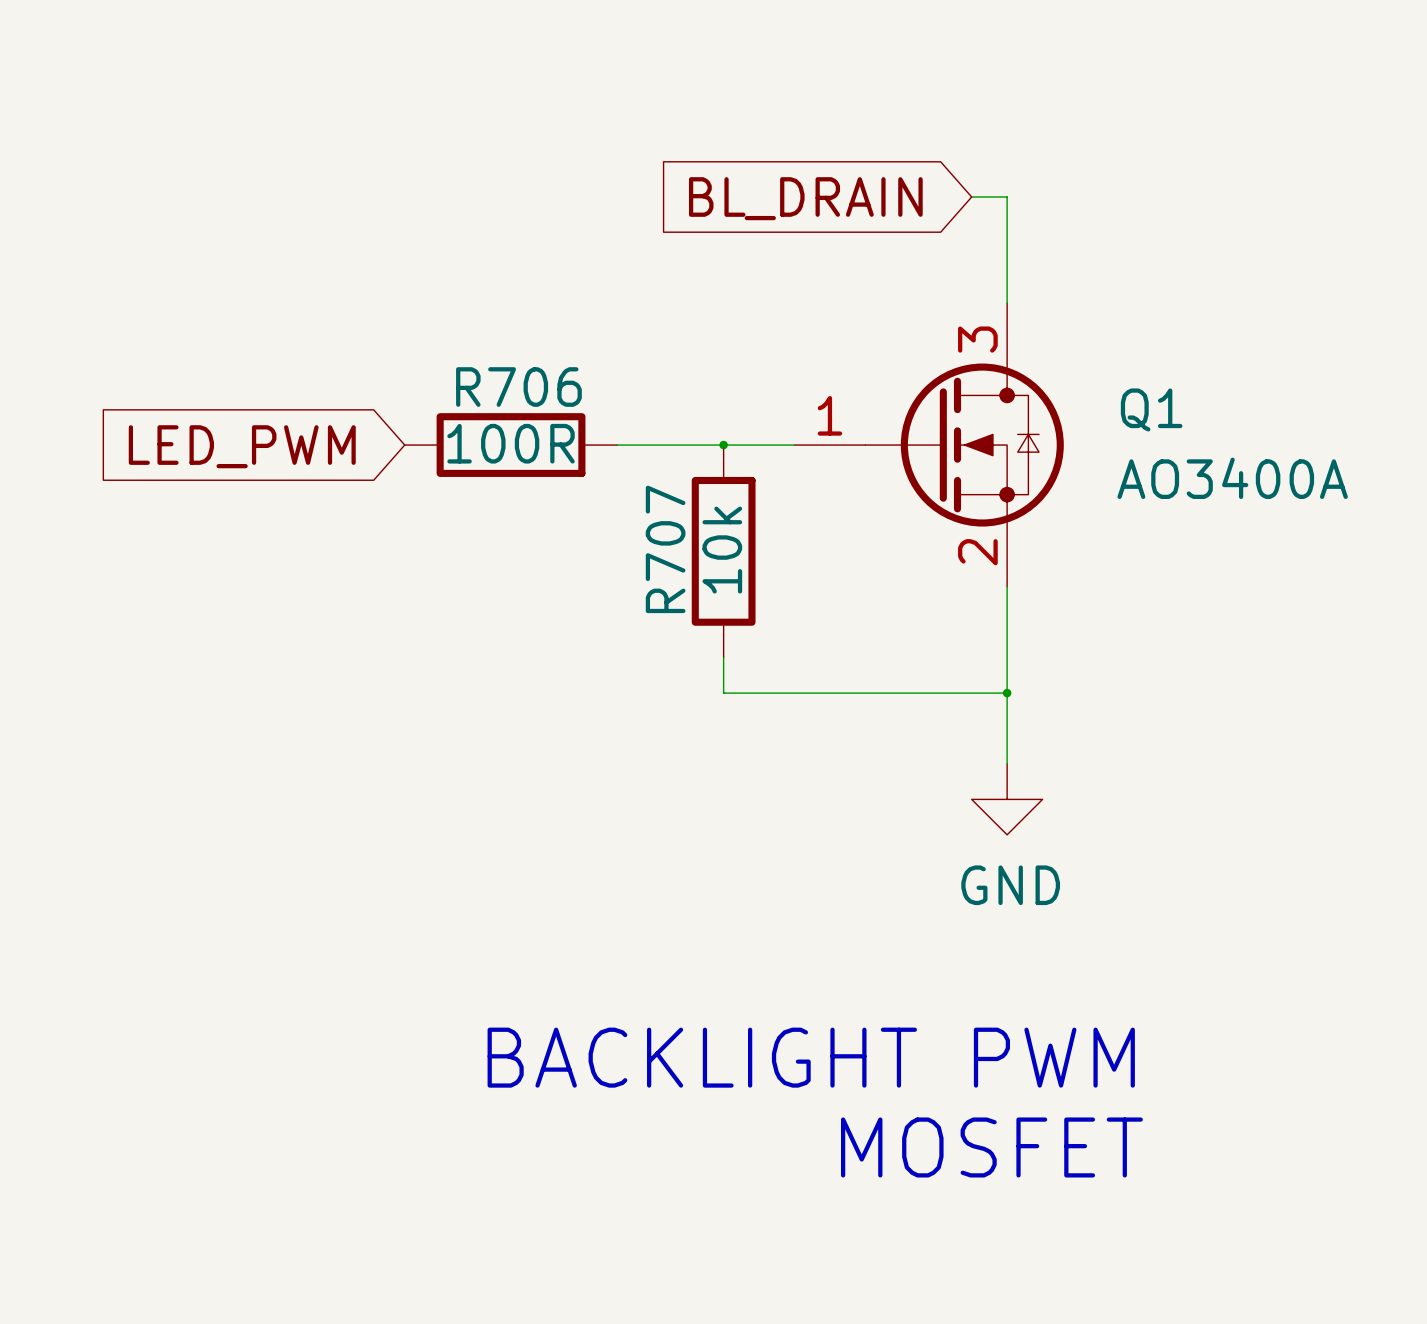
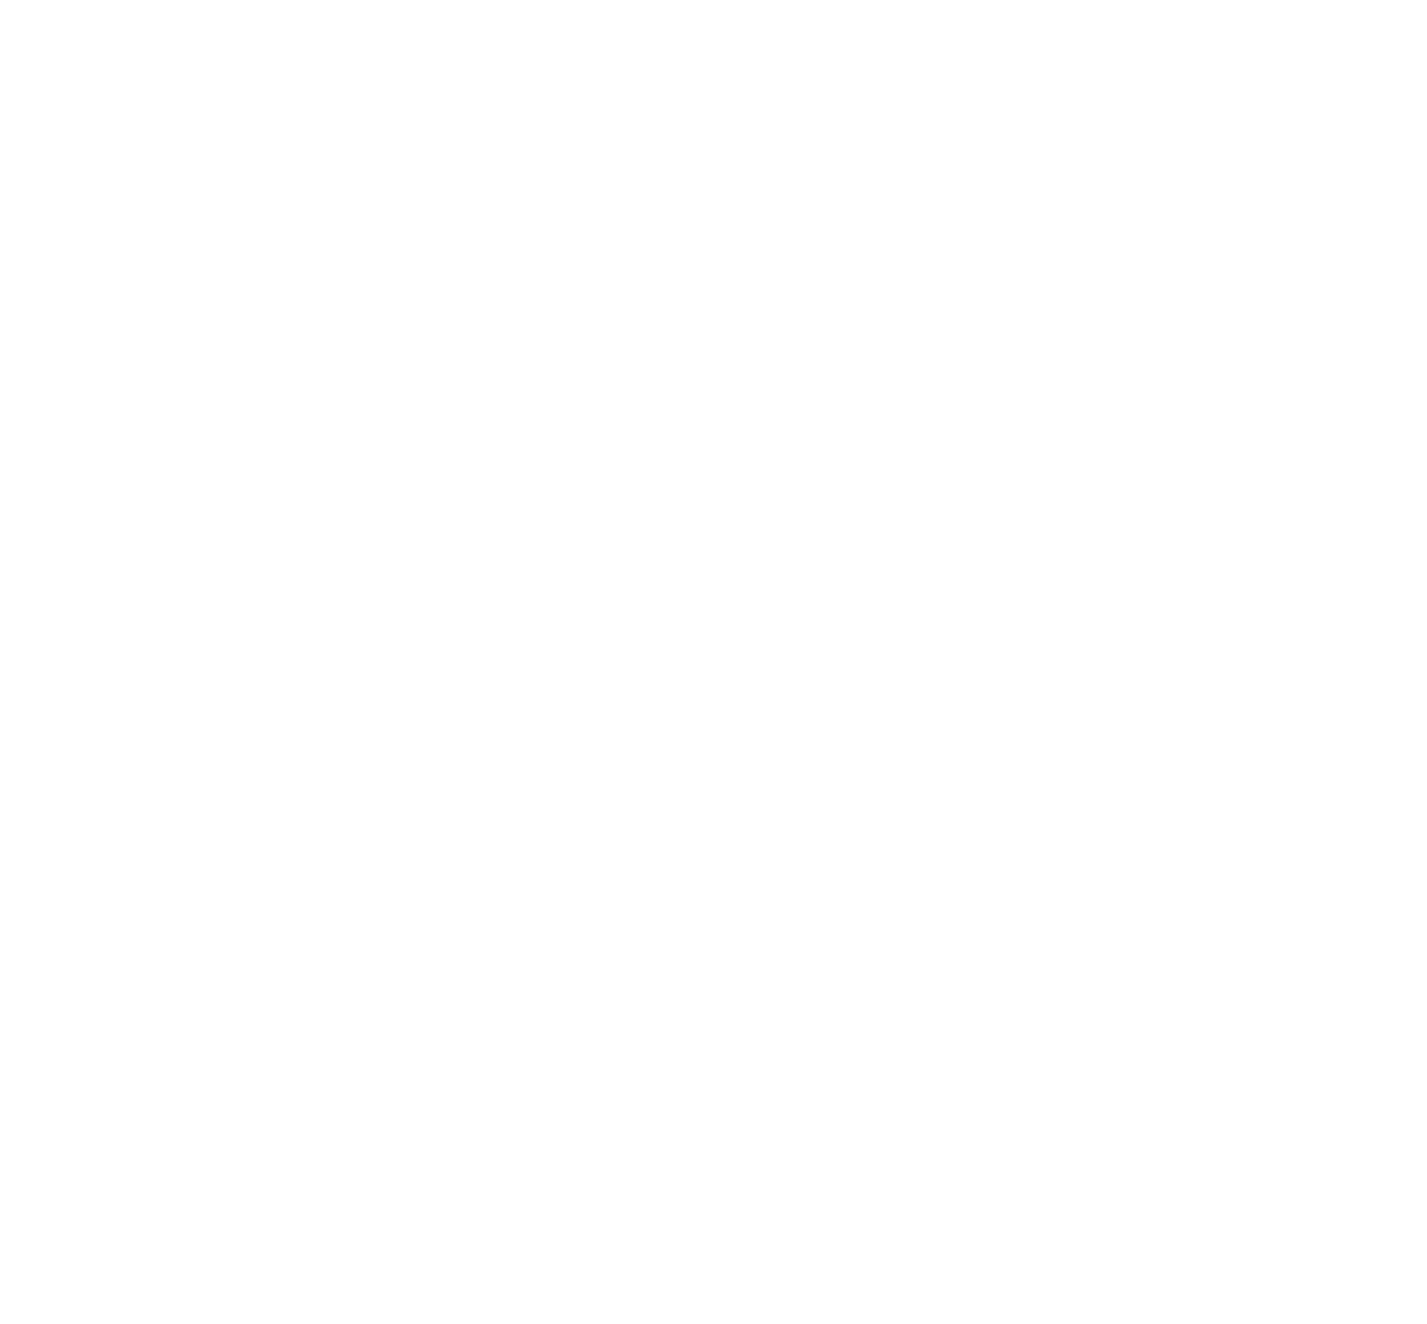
wire: (971, 197) (1007, 197) (1007, 303) -> none
global label: BL_DRAIN (805, 198) -> none
R706: 100R (511, 445) -> none
wire: (617, 445) (794, 445) -> none
junction: (723, 445) -> none
Q1: AO3400A (929, 445) -> none
global label: LED_PWM (242, 446) -> none
R707: 10k (723, 551) -> none
wire: (1007, 586) (1007, 763) -> none
wire: (723, 657) (723, 693) (1007, 693) -> none
junction: (1007, 693) -> none
power symbol: GND (1007, 799) -> none
text: BACKLIGHT PWM (811, 1057) -> none
text: MOSFET (991, 1147) -> none

